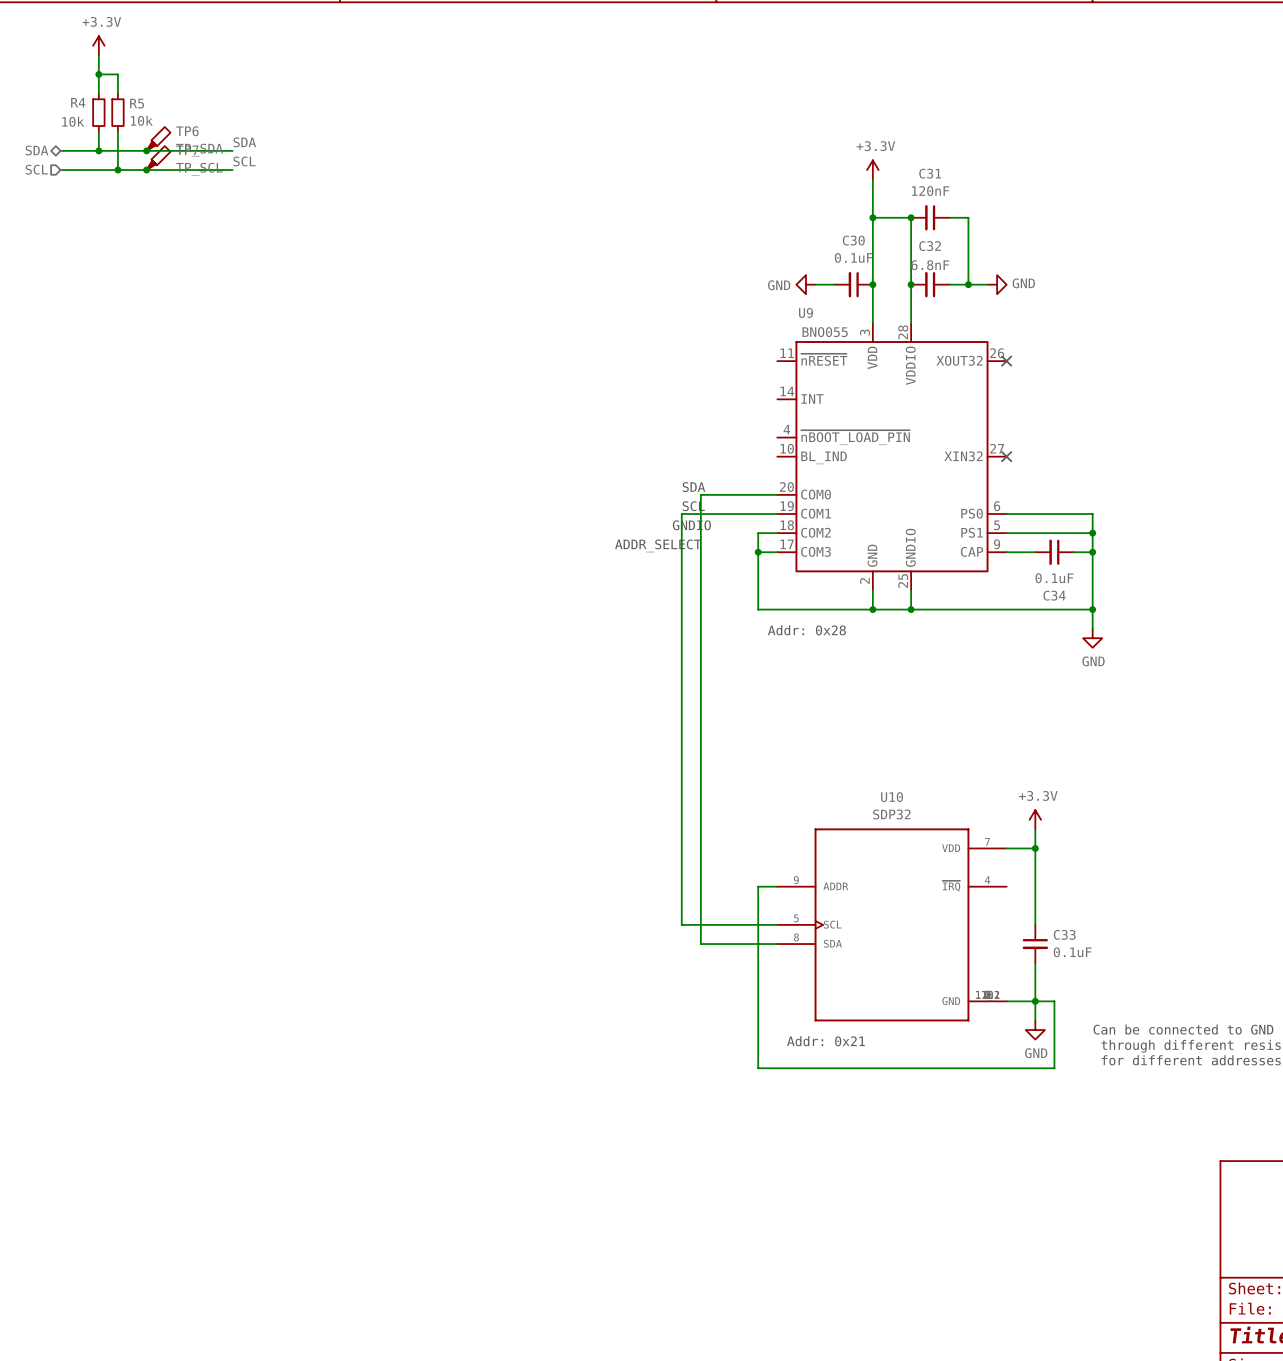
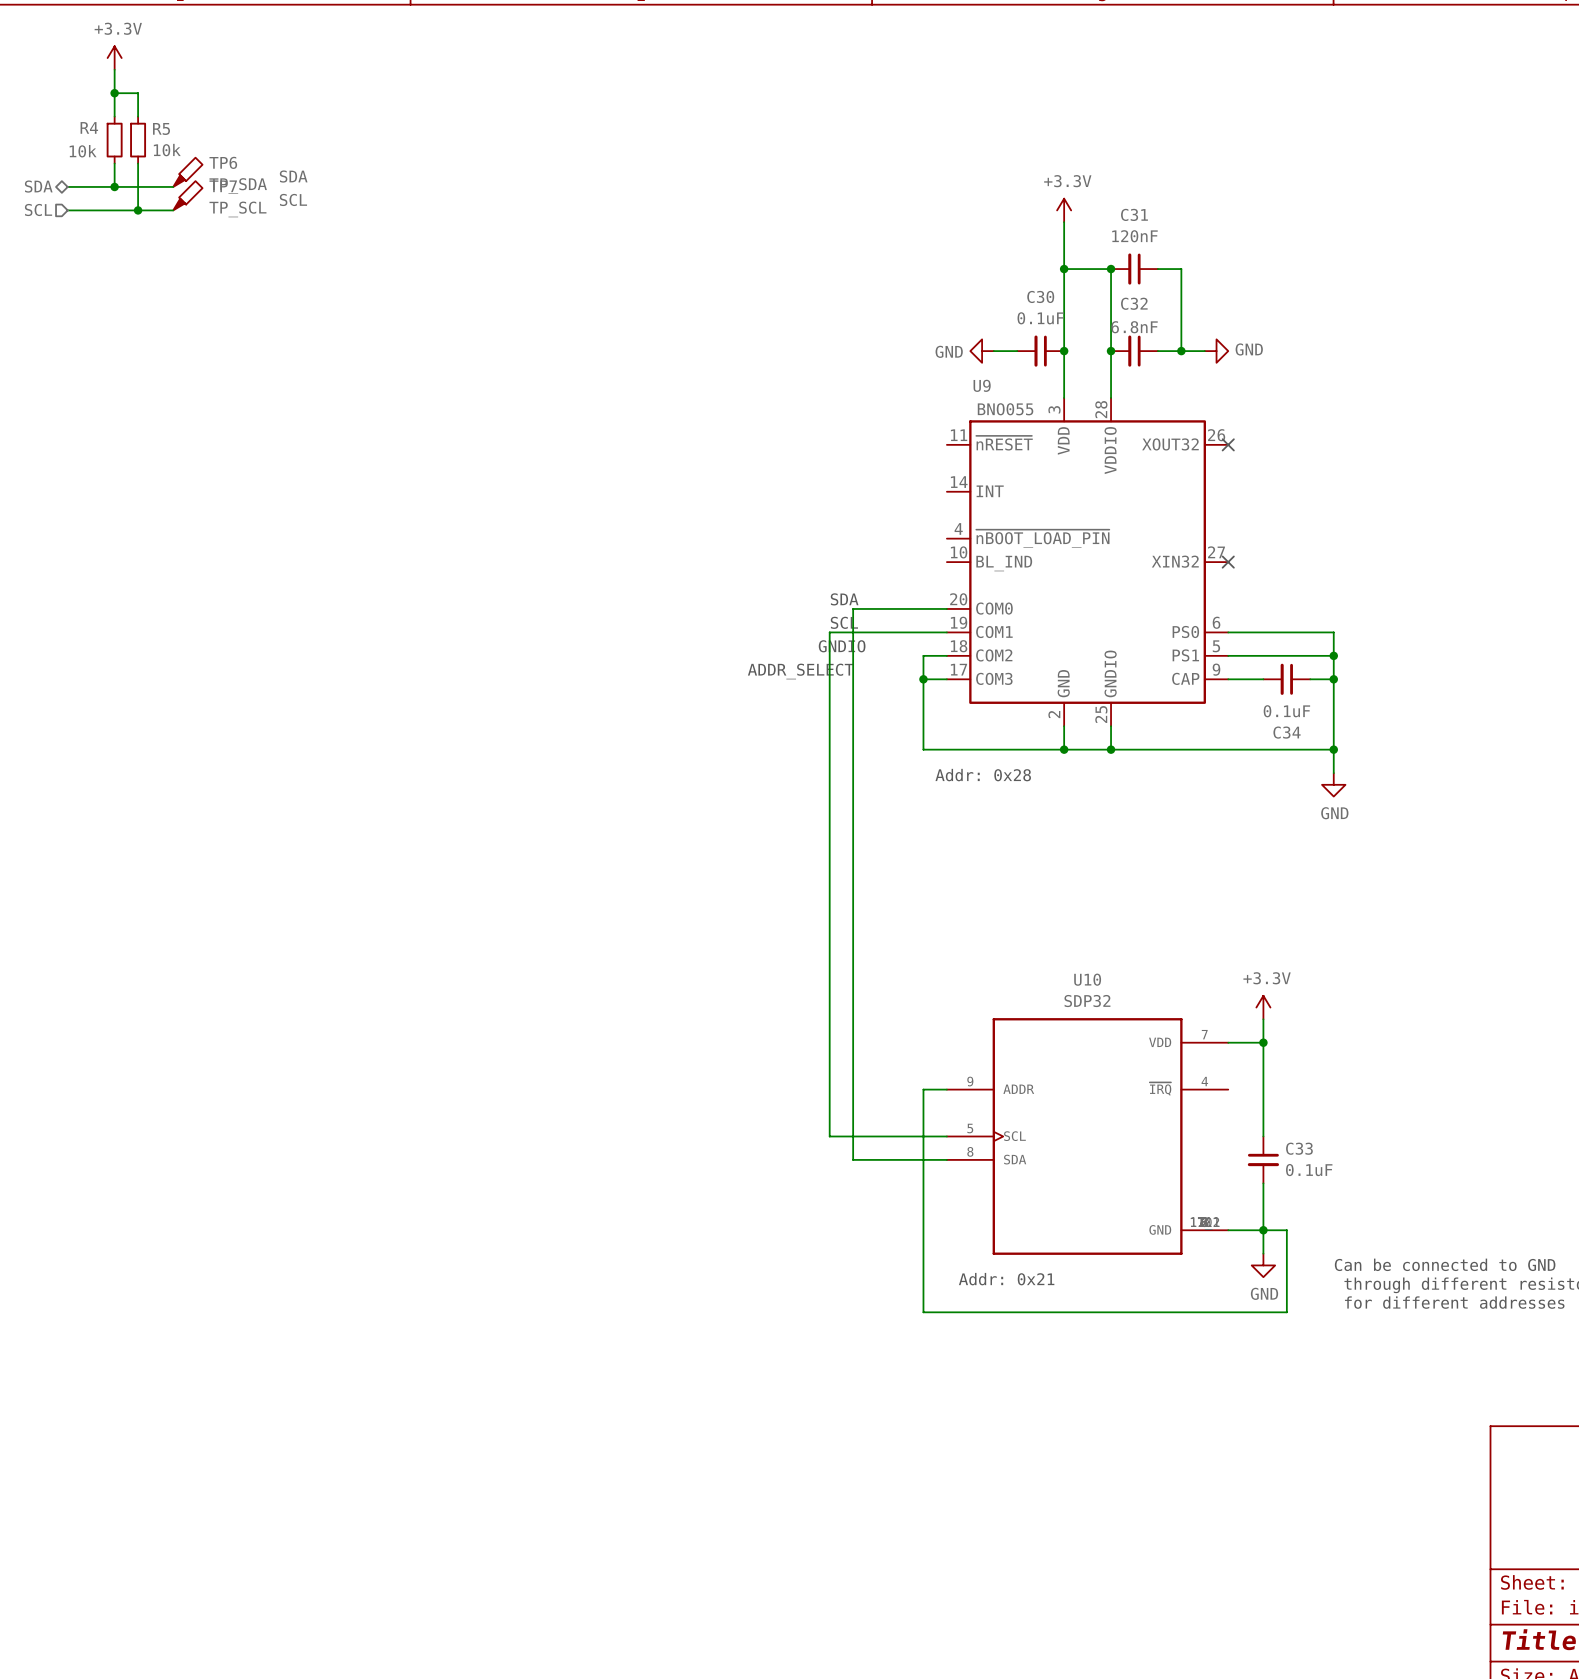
wire: (146, 150) (232, 150) -> none
junction: (146, 150) -> none
wire: (146, 170) (232, 170) -> none
junction: (146, 170) -> none

